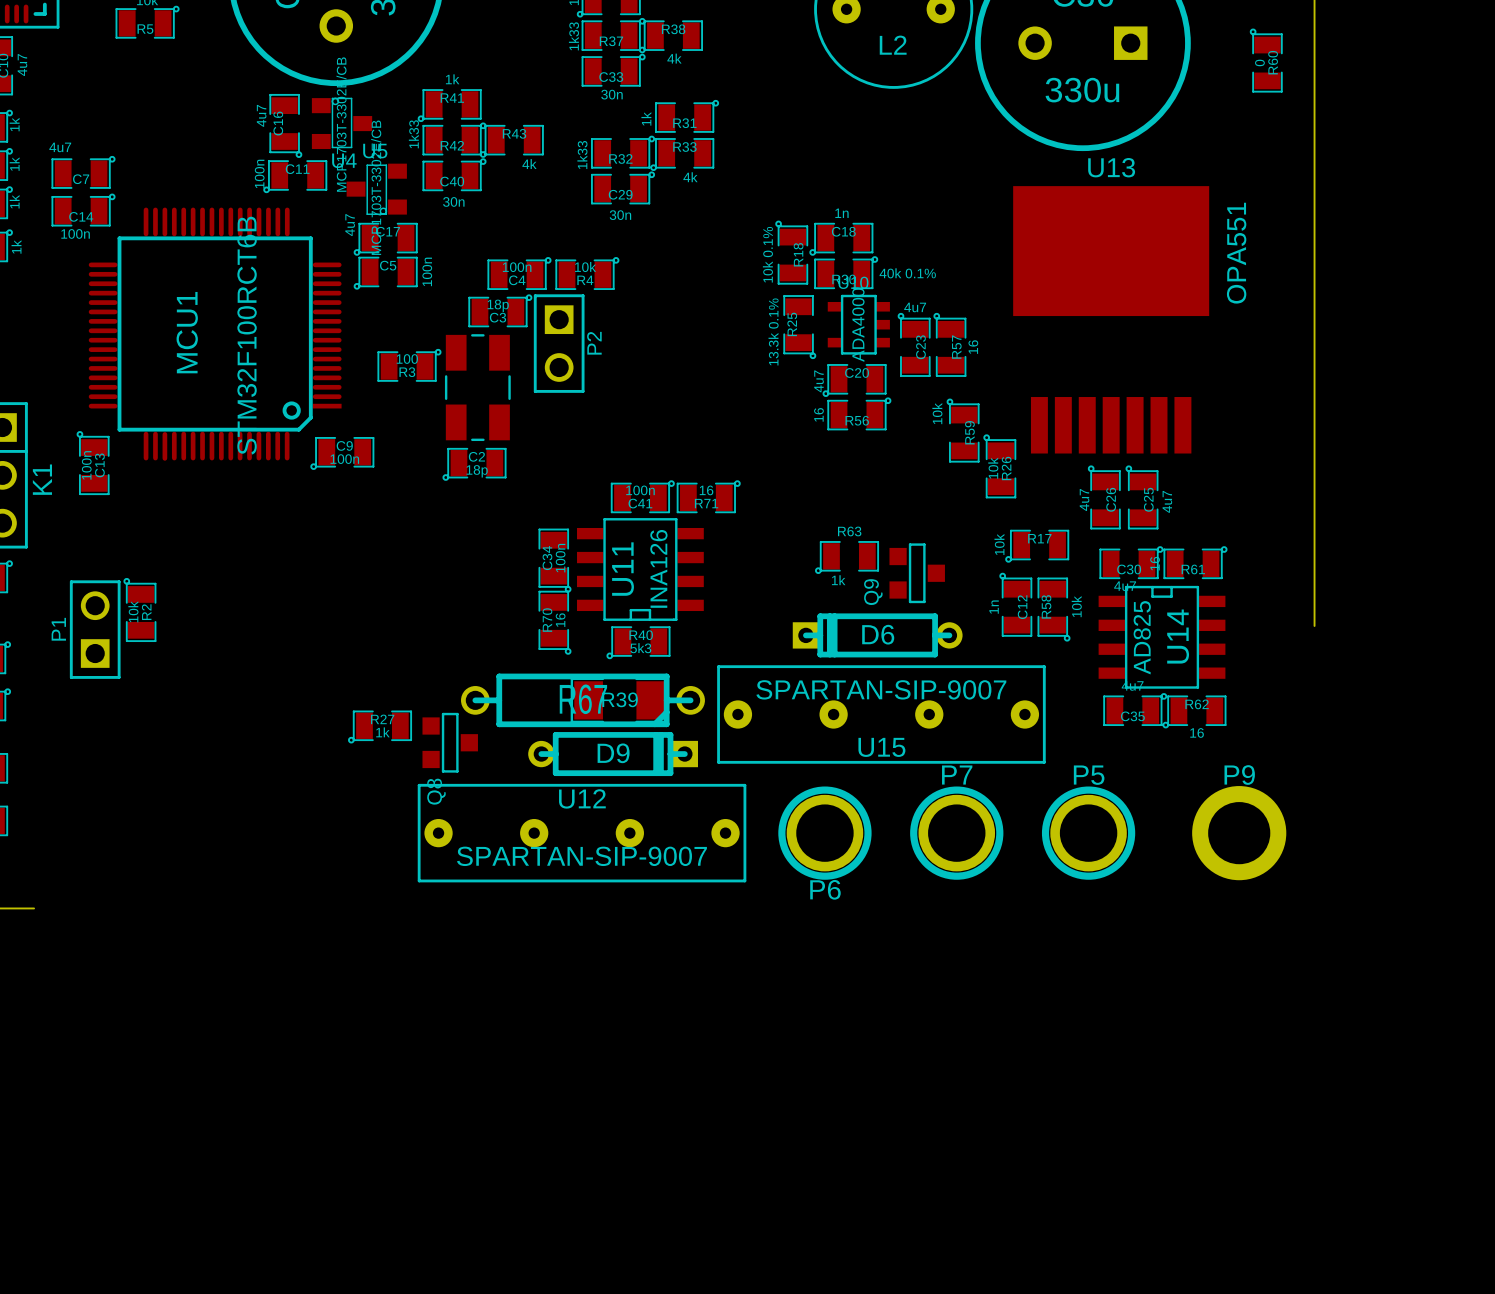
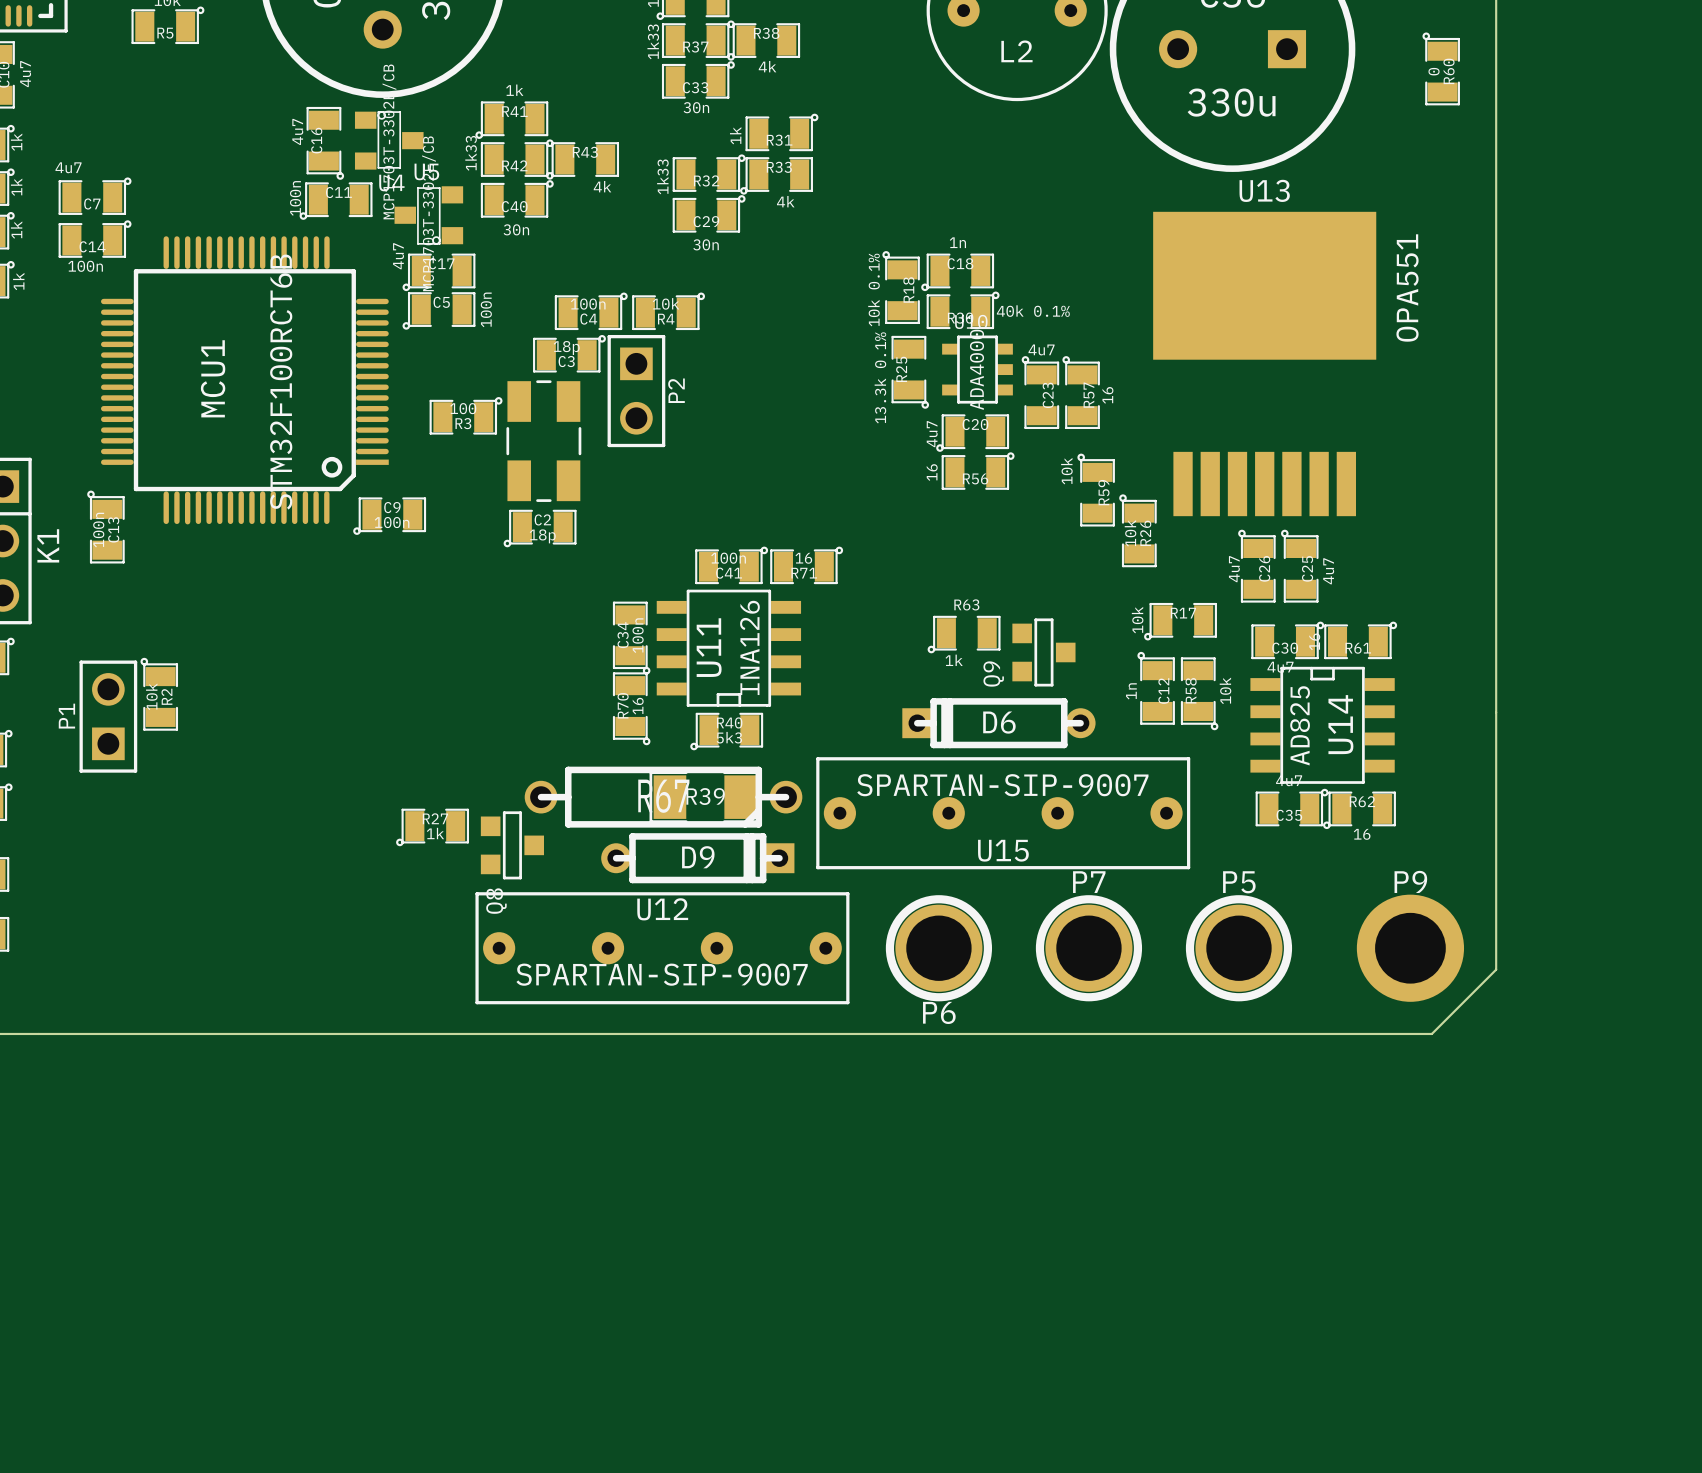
board edge: none -> (1496, 712) (1496, 969) (1431, 1033) (38, 1033)

